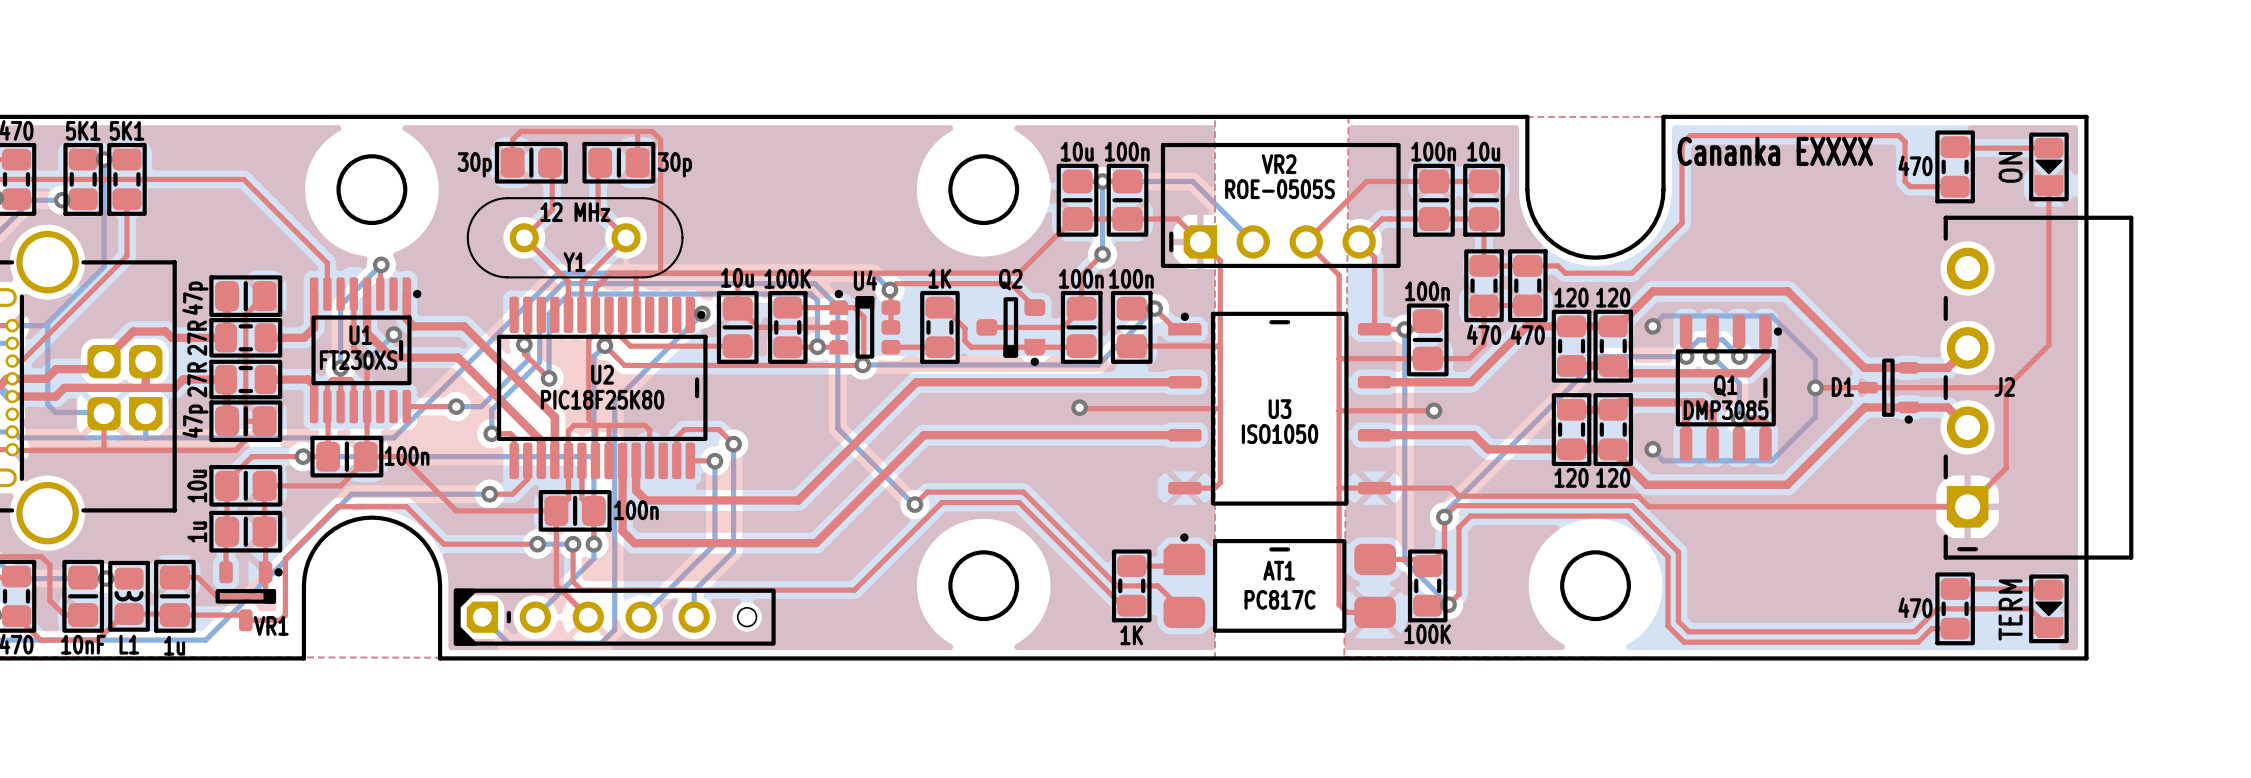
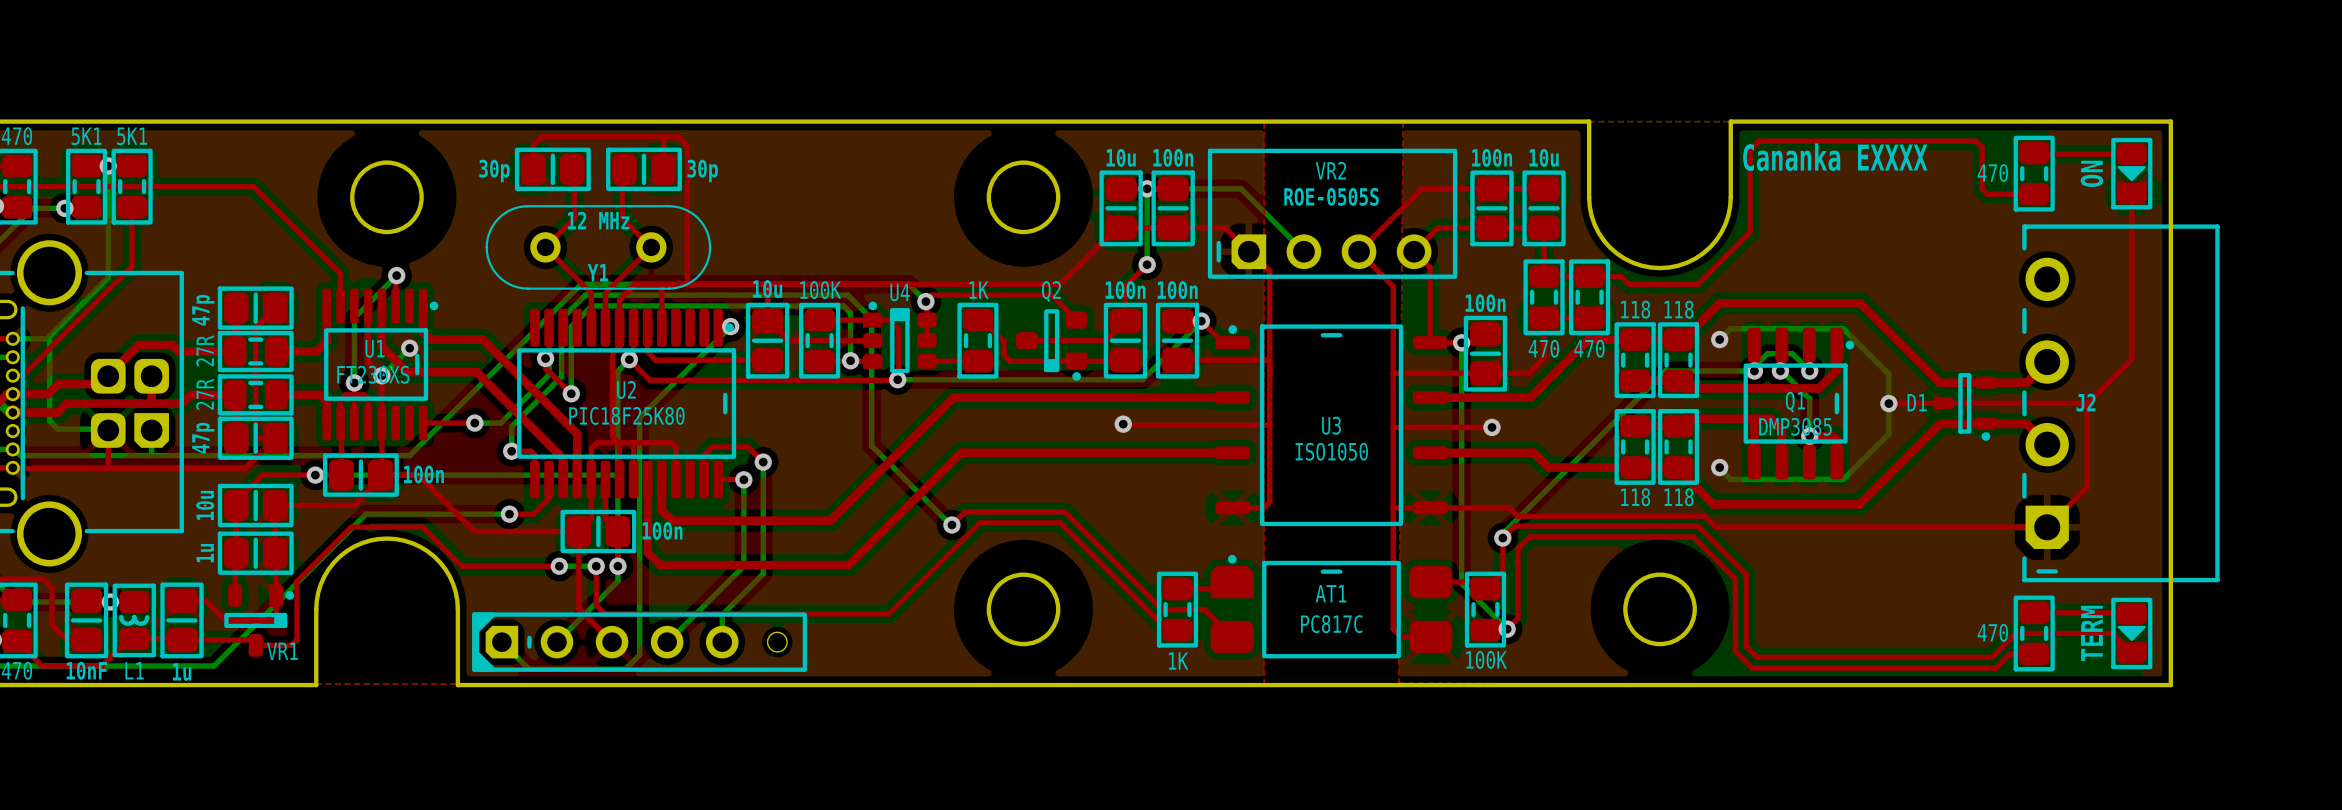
part value: 120 (1571, 297) -> 118 (1635, 309)
part value: 120 (1613, 297) -> 118 (1679, 309)
part value: 120 (1571, 477) -> 118 (1635, 497)
part value: 120 (1613, 477) -> 118 (1679, 497)

